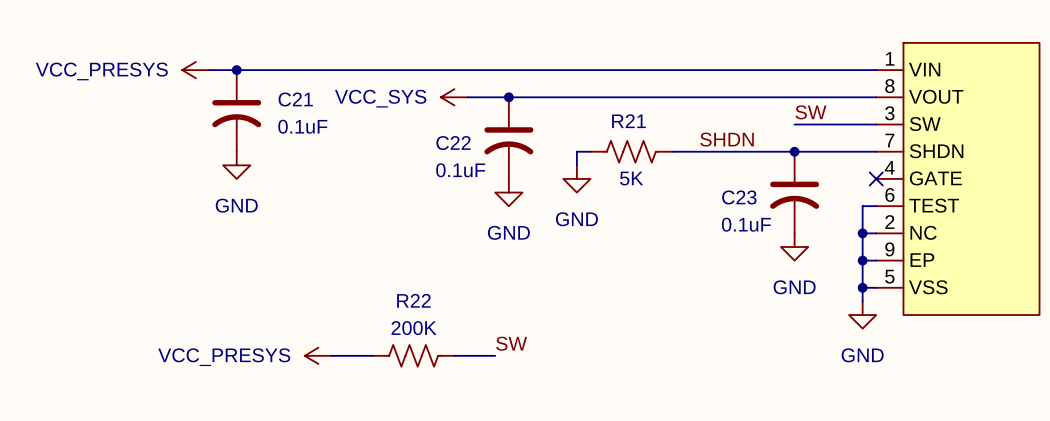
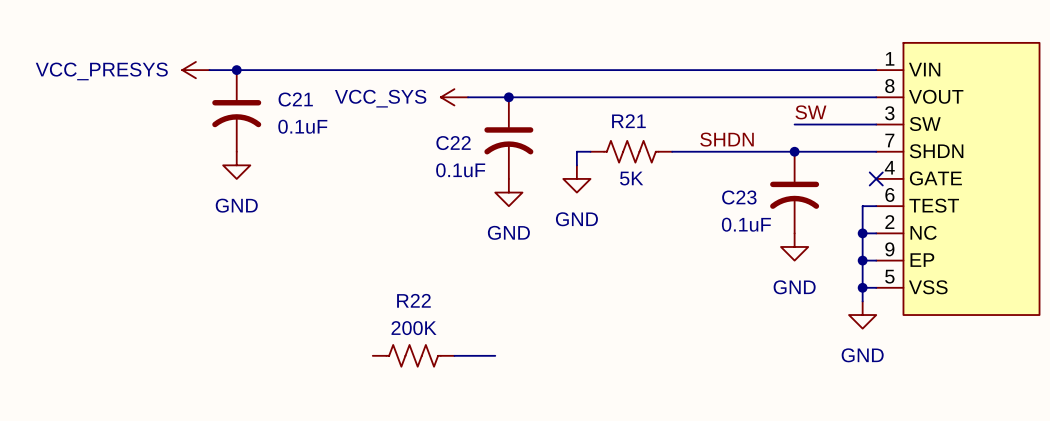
label: SW (511, 343) -> none
power symbol: VCC_PRESYS (318, 355) -> none
wire: (331, 355) (372, 355) -> none

